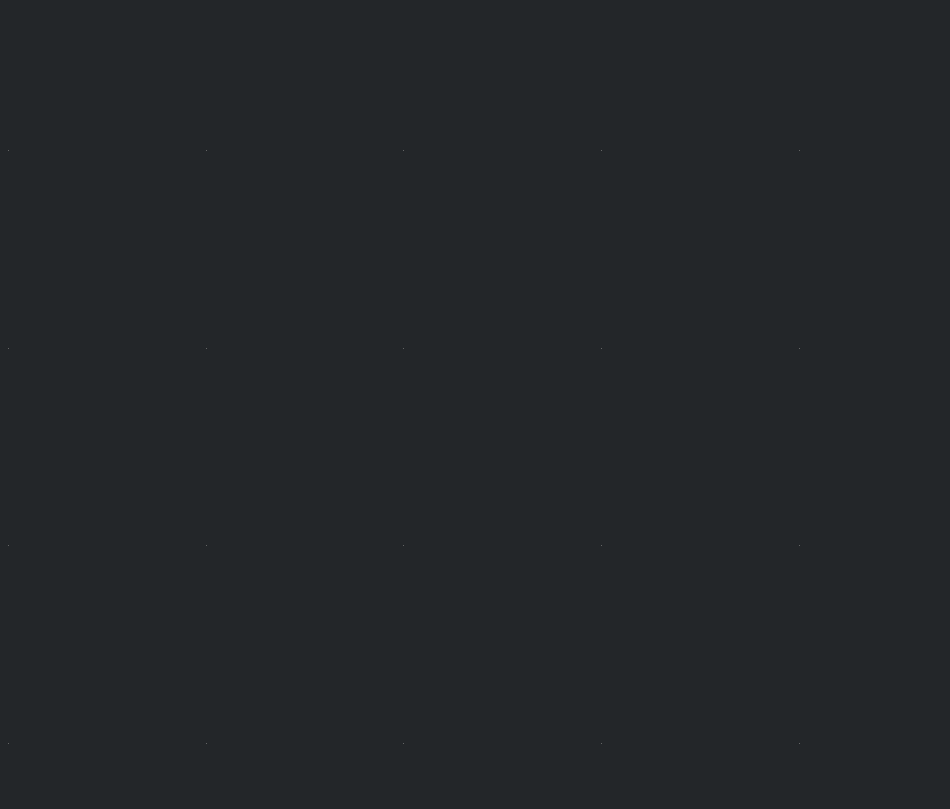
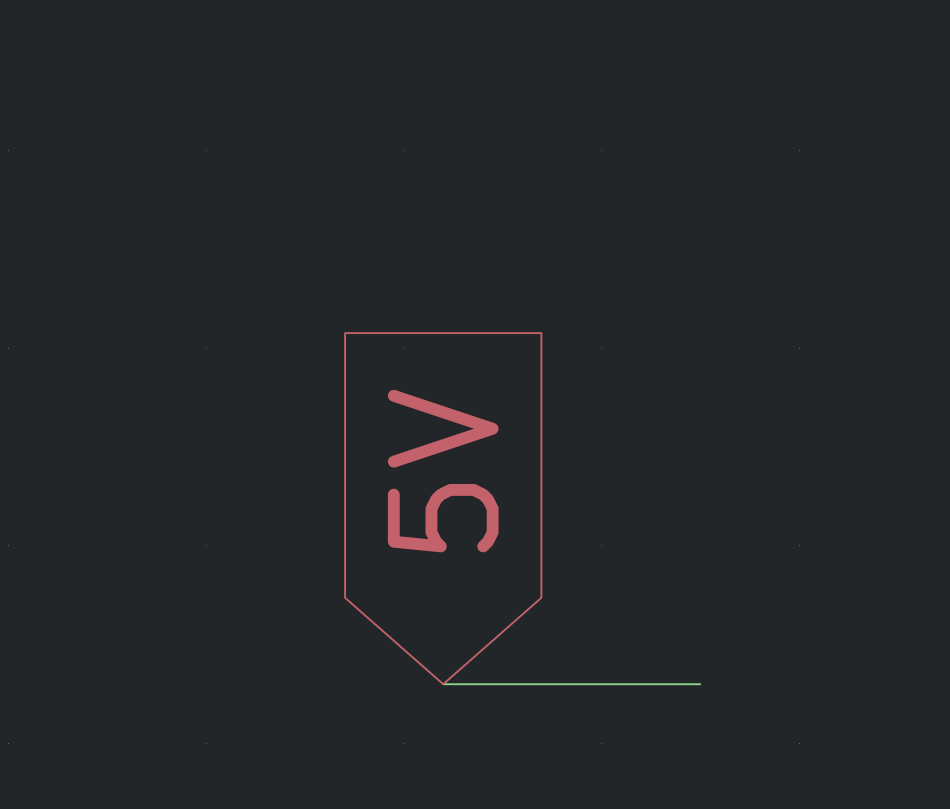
global label: none -> 5V (443, 471)
wire: none -> (443, 684) (700, 684)

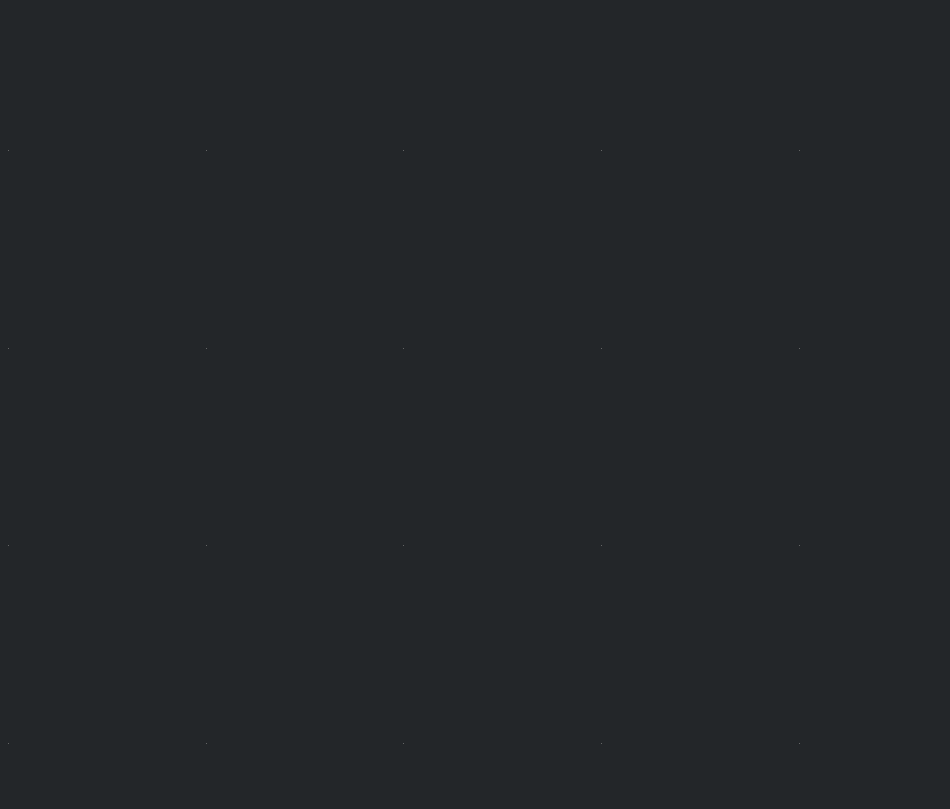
global label: 5V (443, 471) -> none
wire: (443, 684) (700, 684) -> none

